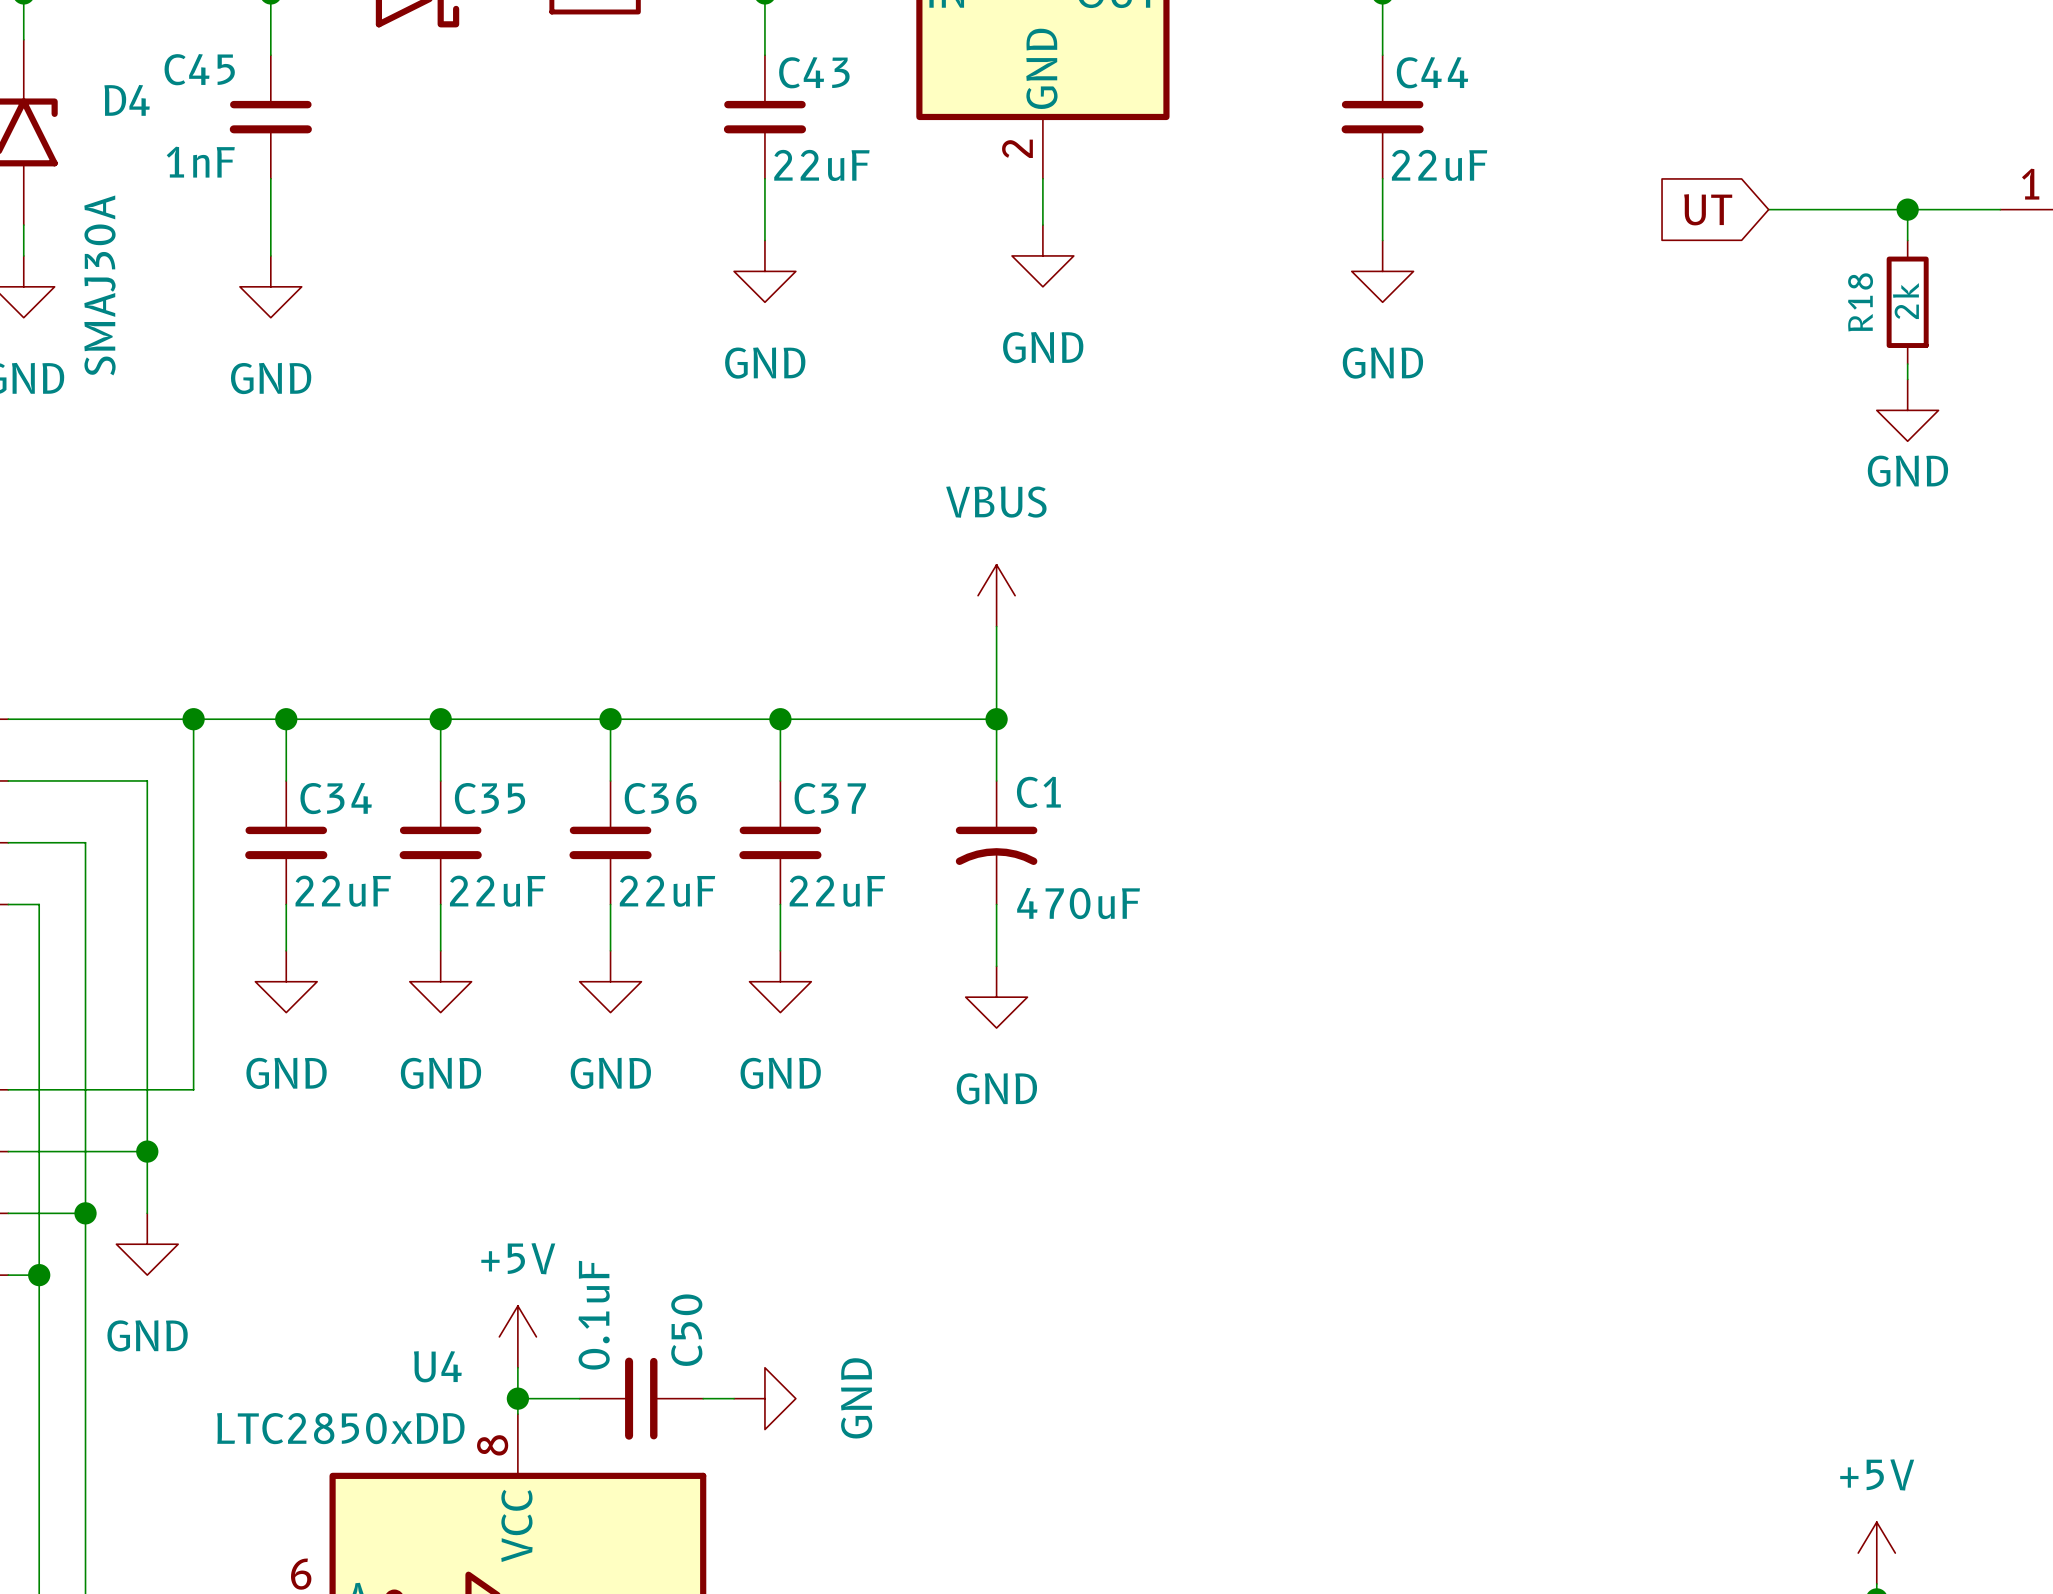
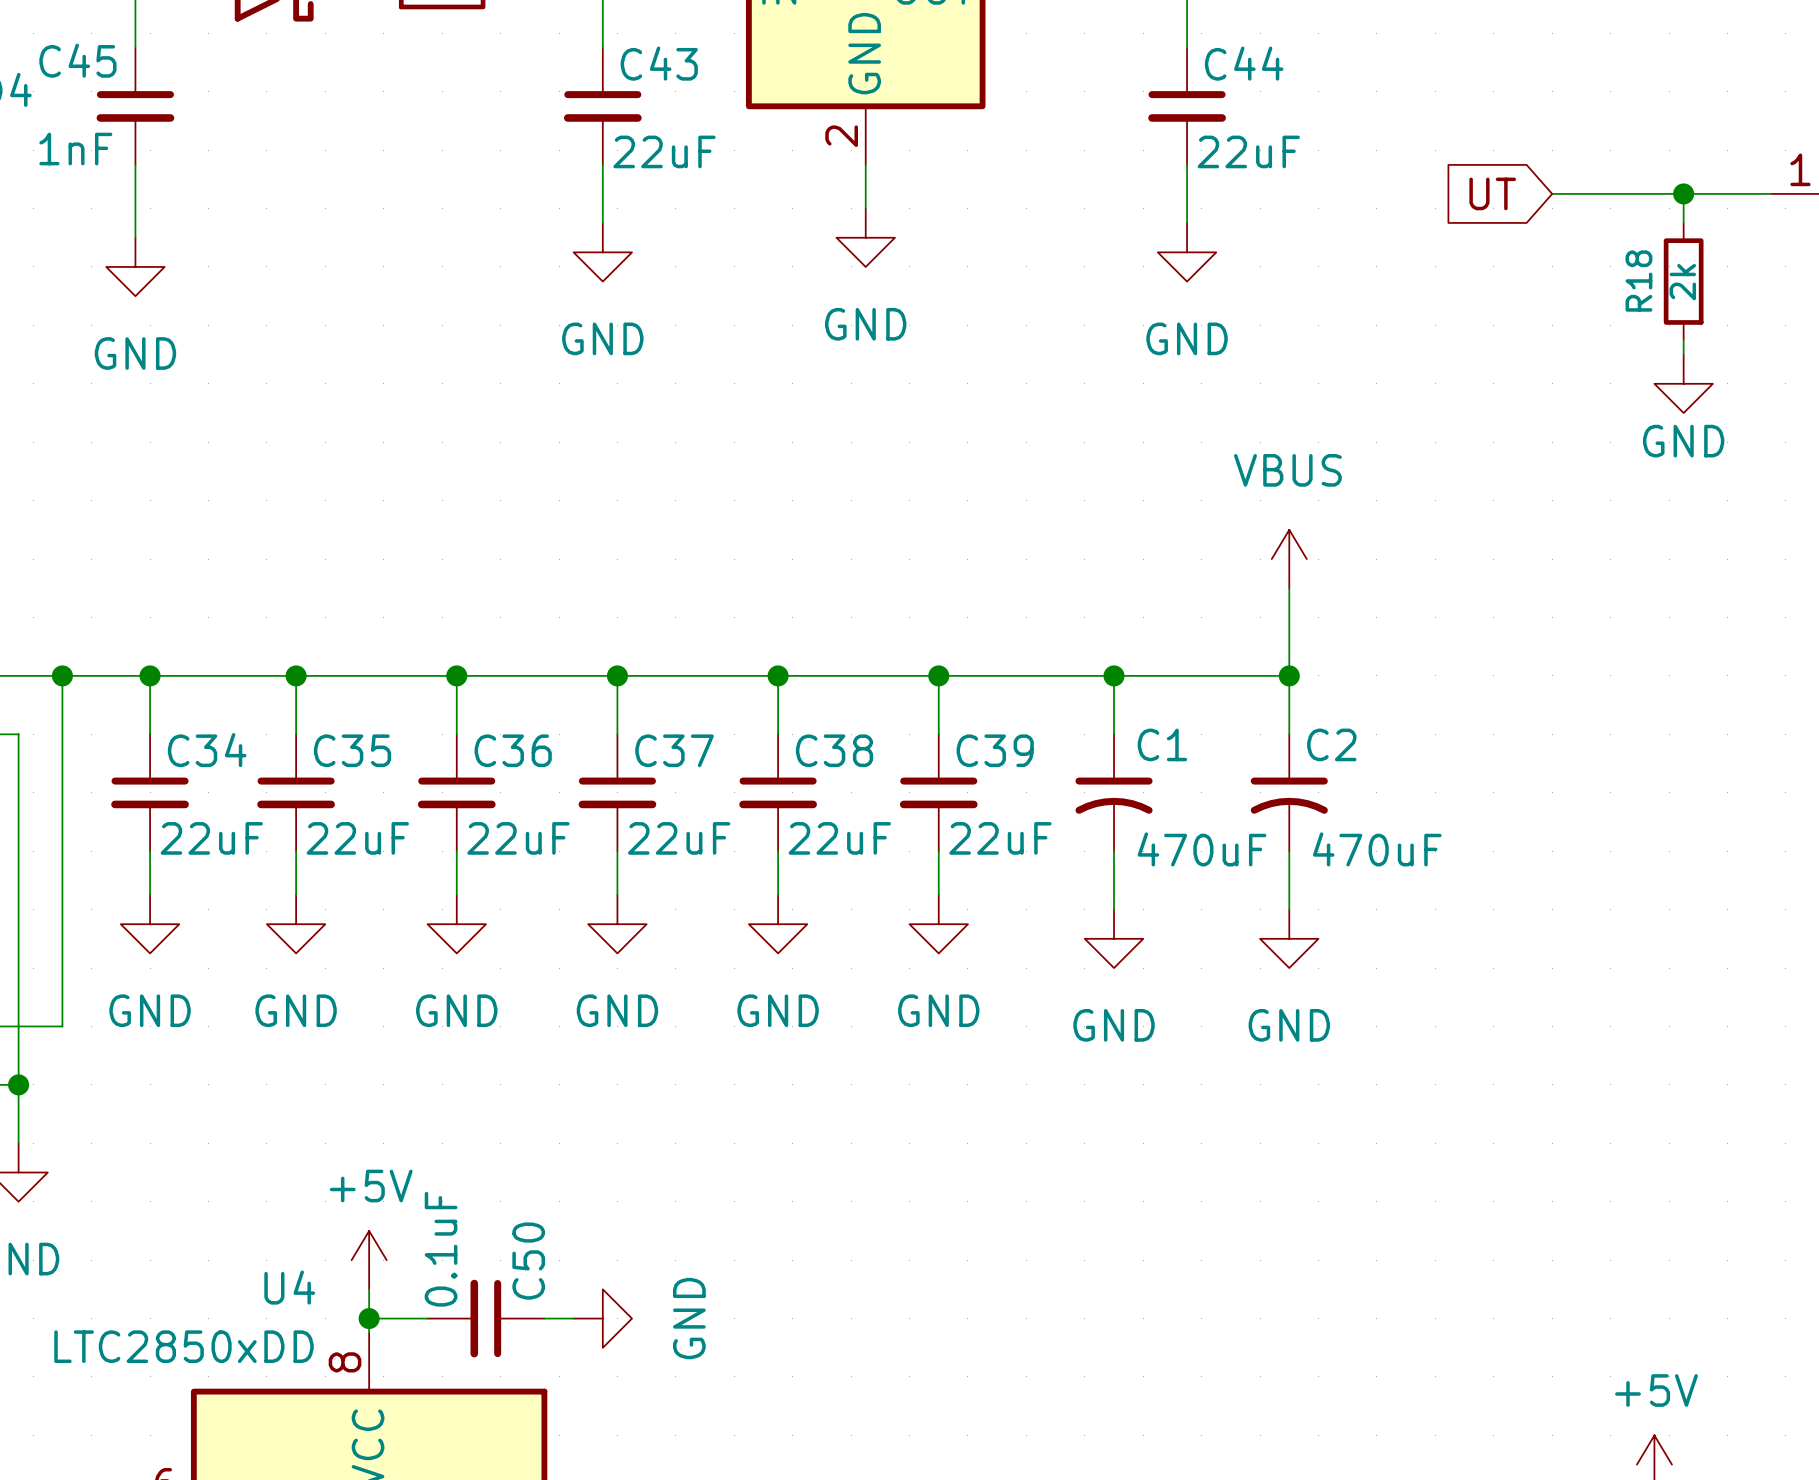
power symbol position: VBUS (996, 595) -> VBUS (1289, 559)
wire: (996, 626) (996, 780) -> (1289, 588) (1289, 734)
wire: none -> (778, 675) (778, 734)
wire: none -> (821, 675) (1289, 675)
junction position: (996, 719) -> (778, 675)
wire: none -> (938, 675) (938, 734)
junction: none -> (938, 675)
wire: none -> (1114, 675) (1114, 734)
junction: none -> (1114, 675)
junction: none -> (1289, 675)
C38: none -> 22uF (778, 792)
C1 position: (996, 842) -> (1114, 792)
C39: none -> 22uF (938, 792)
C2: none -> 470uF (1289, 792)
wire: none -> (778, 851) (778, 895)
wire: (996, 904) (996, 966) -> (1289, 851) (1289, 909)
wire: none -> (938, 851) (938, 895)
wire: none -> (1114, 851) (1114, 909)
power symbol: none -> GND (938, 924)
power symbol position: GND (996, 997) -> GND (778, 924)
power symbol: none -> GND (1114, 938)
power symbol: none -> GND (1289, 938)

